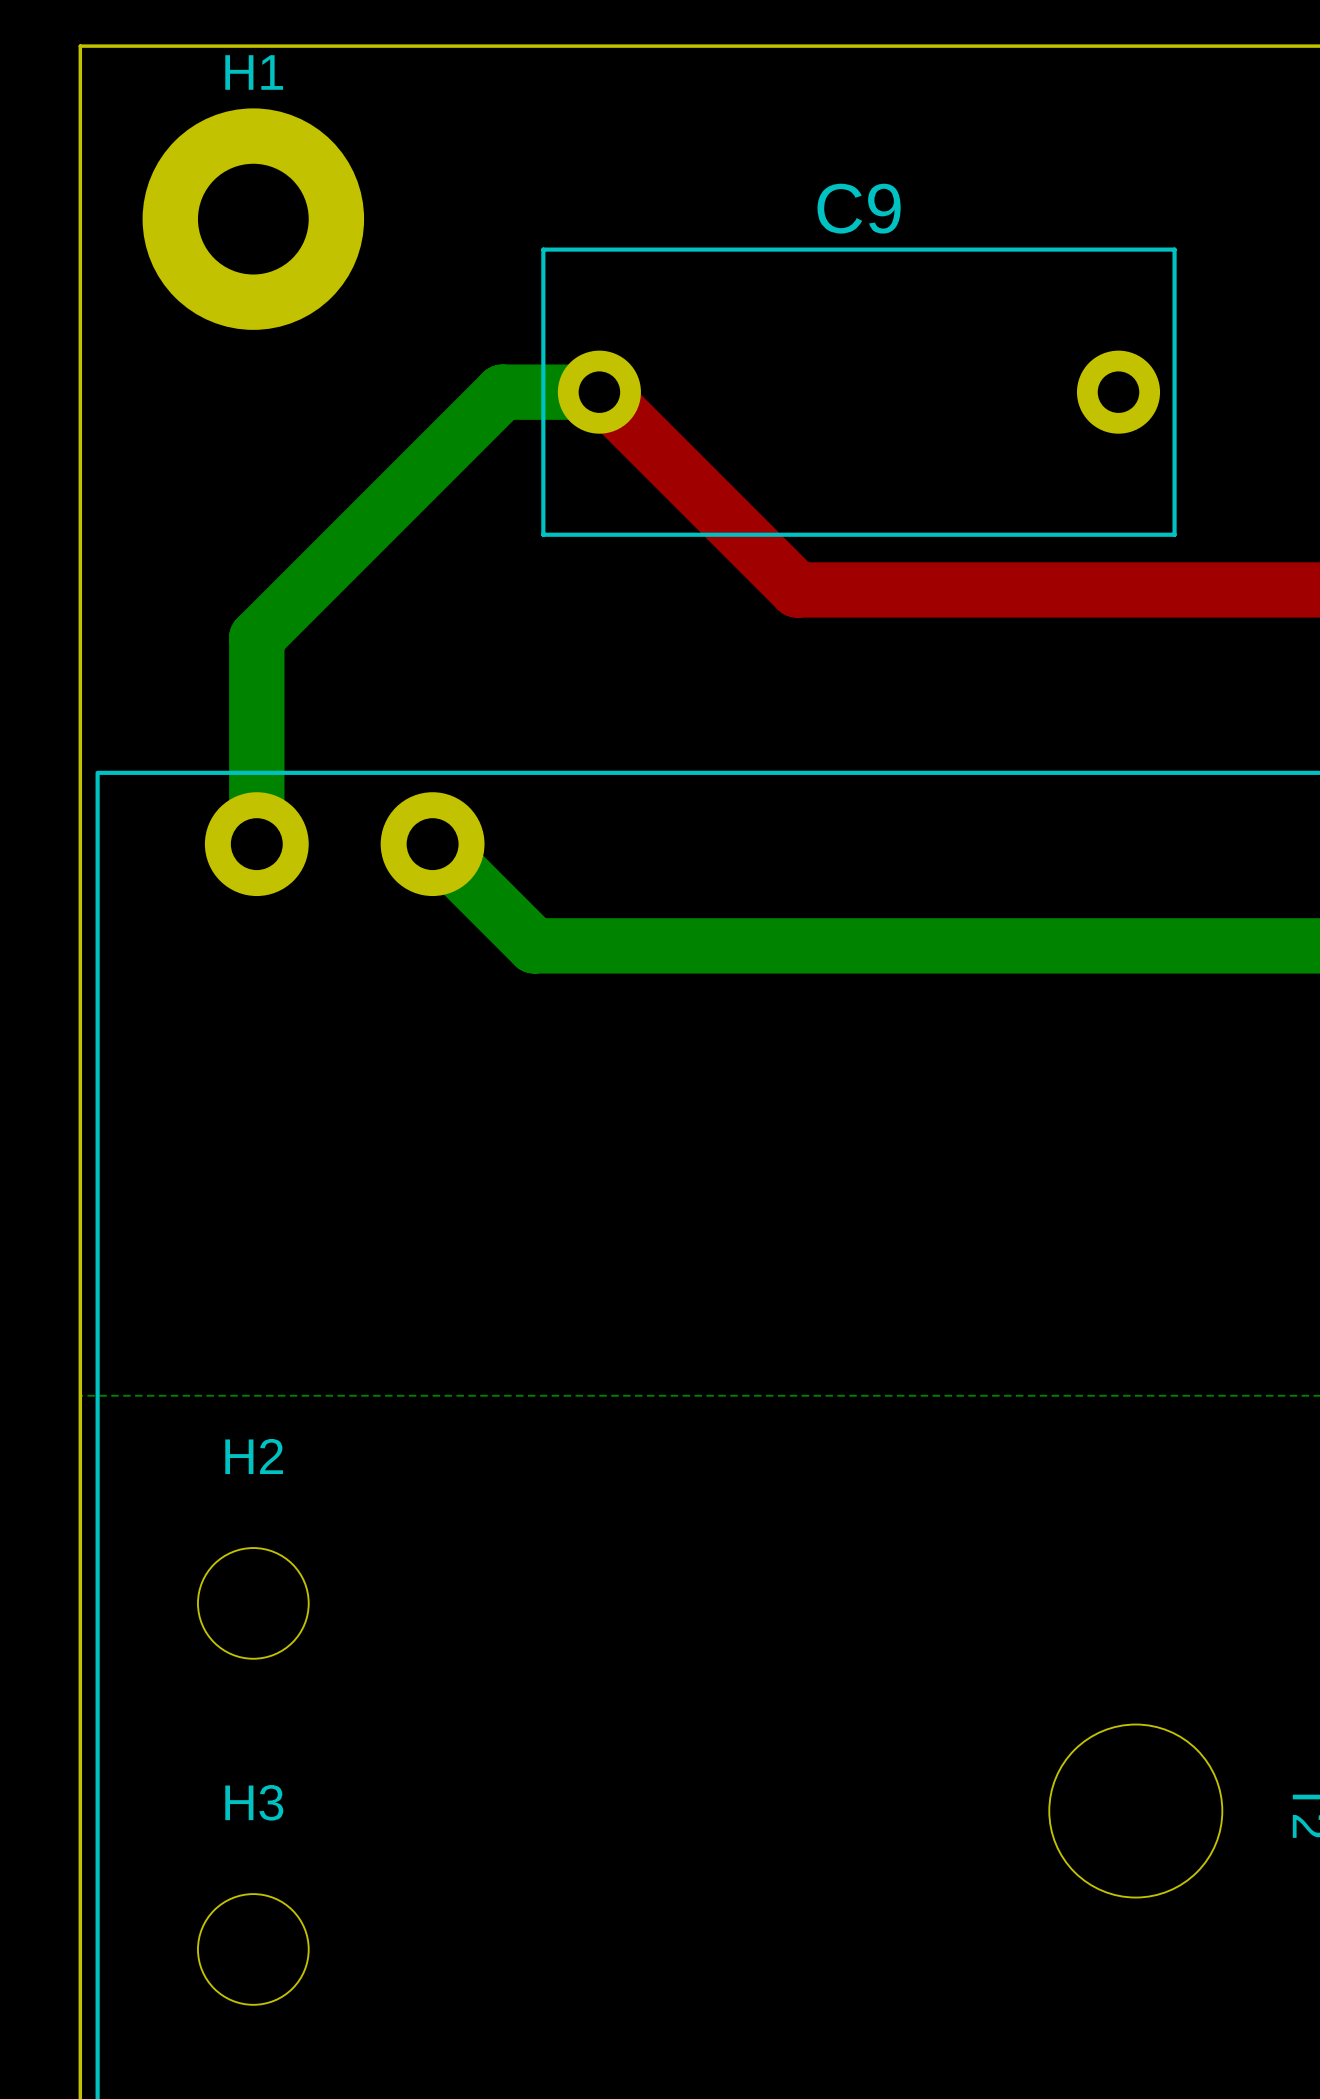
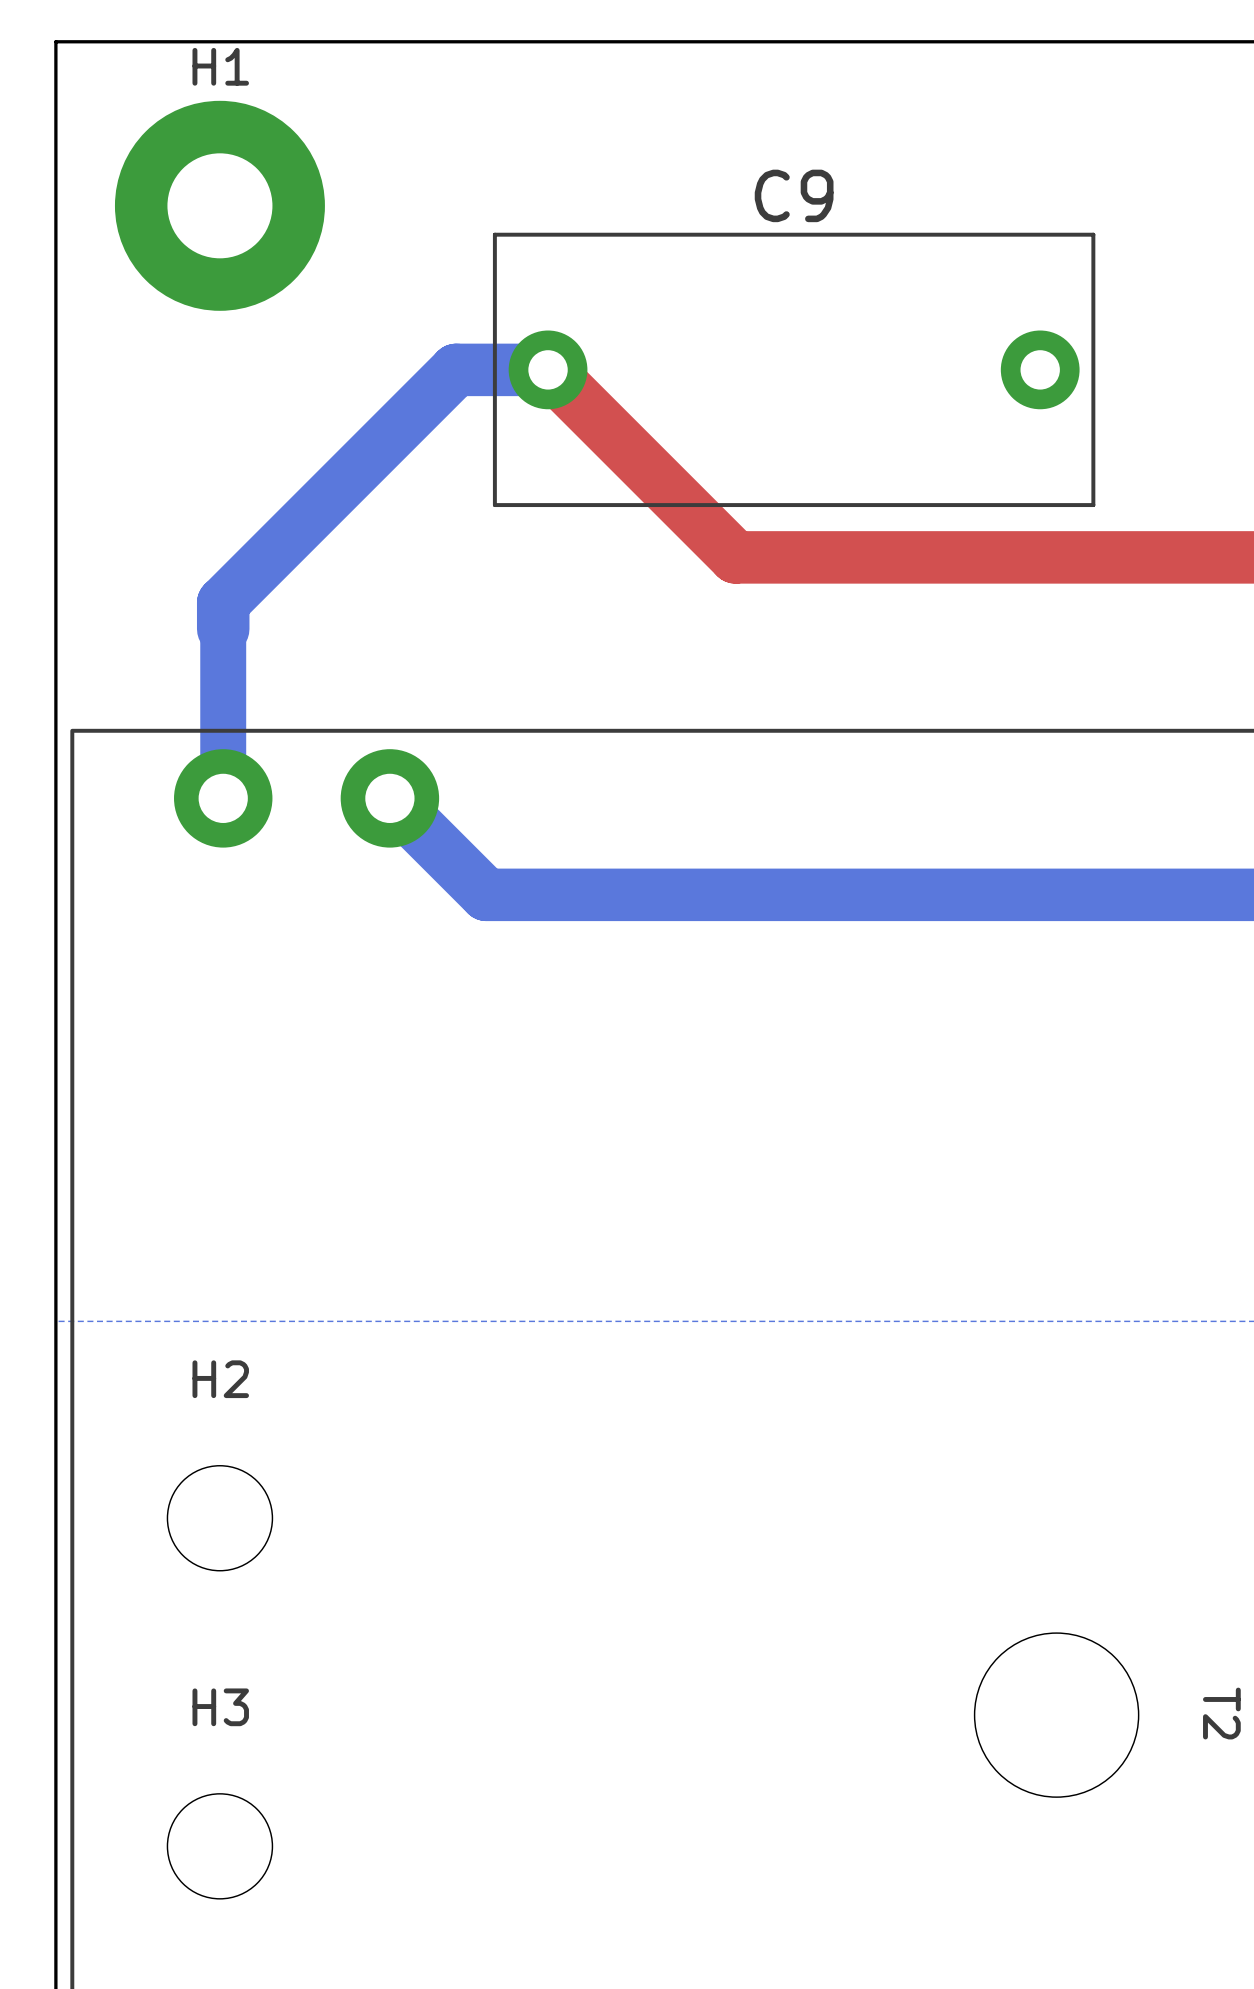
bottom track width: thick (256, 665) (256, 844) -> thin (223, 629) (223, 798)

